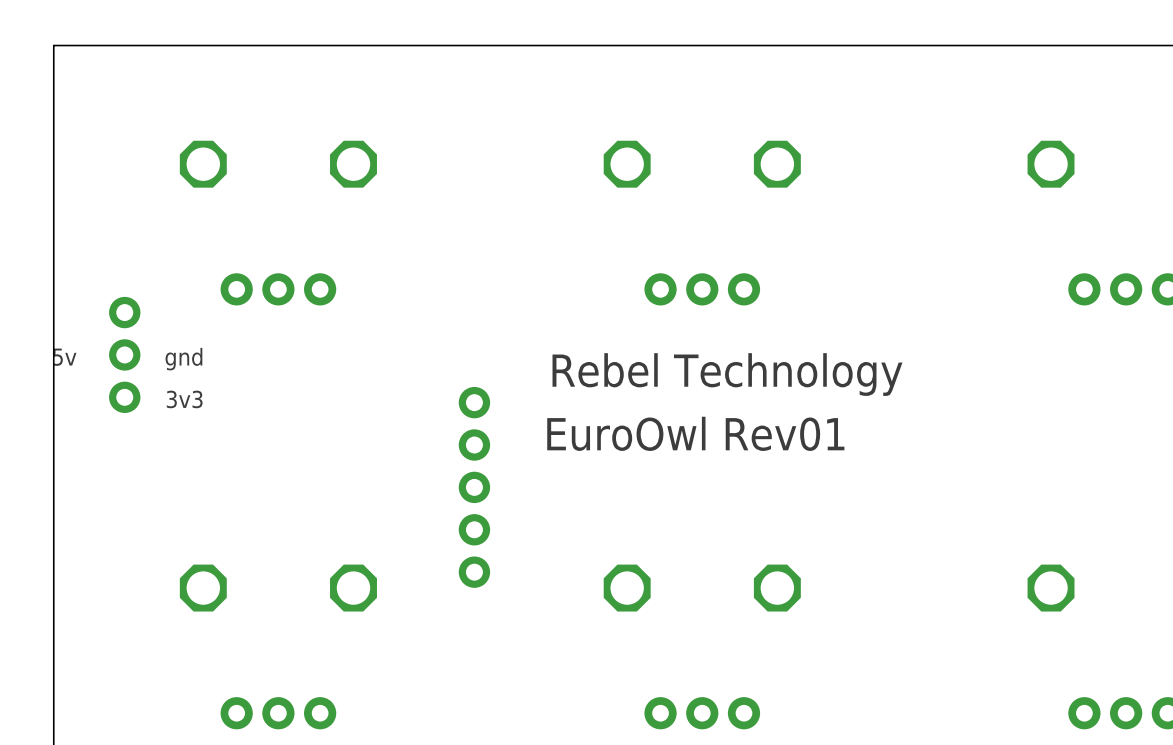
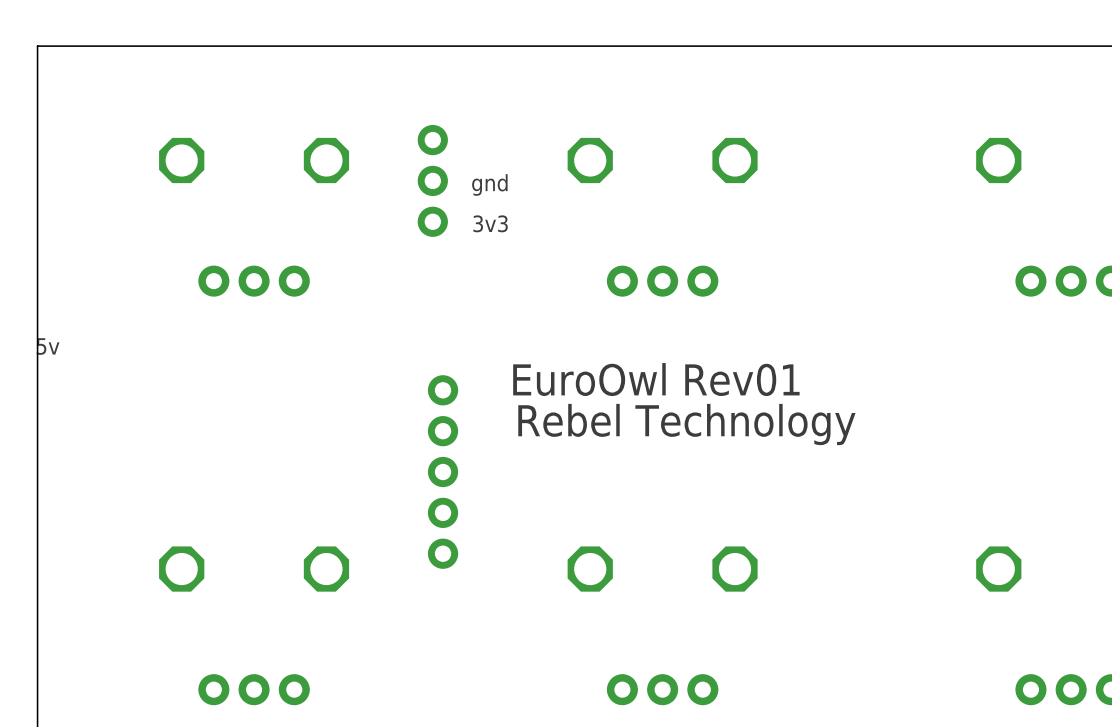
part position: (124, 354) -> (432, 180)
text position: gnd (183, 359) -> gnd (489, 184)
text: Rebel Technology (727, 374) -> none
text: none -> EuroOwl Rev01 (656, 379)
text position: 3v3 (184, 399) -> 3v3 (490, 223)
text: EuroOwl Rev01 (695, 433) -> Rebel Technology (686, 424)

